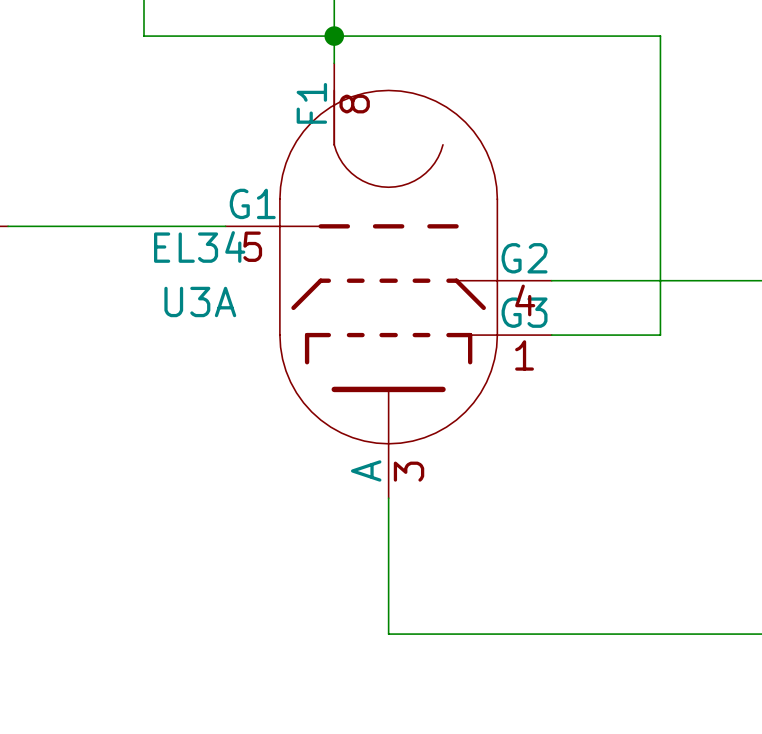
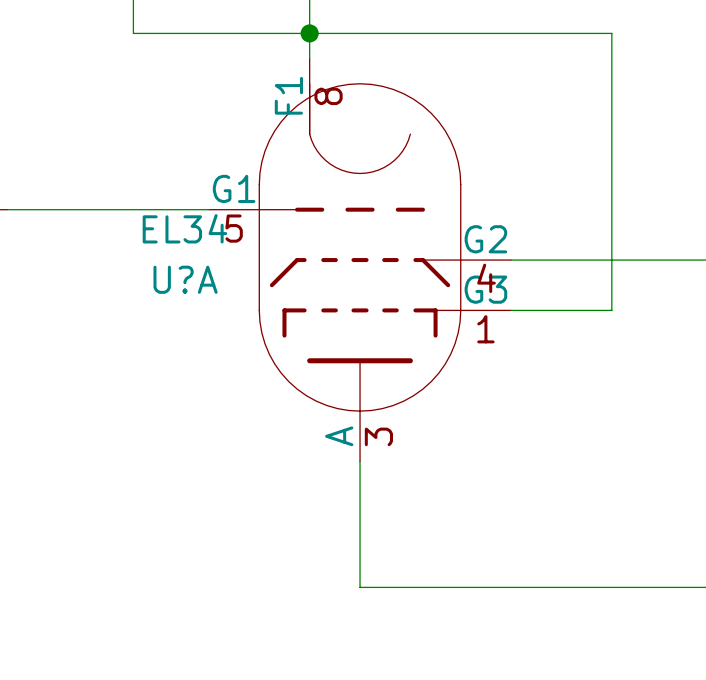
U3A name: U3A (200, 301) -> U?A (185, 279)

